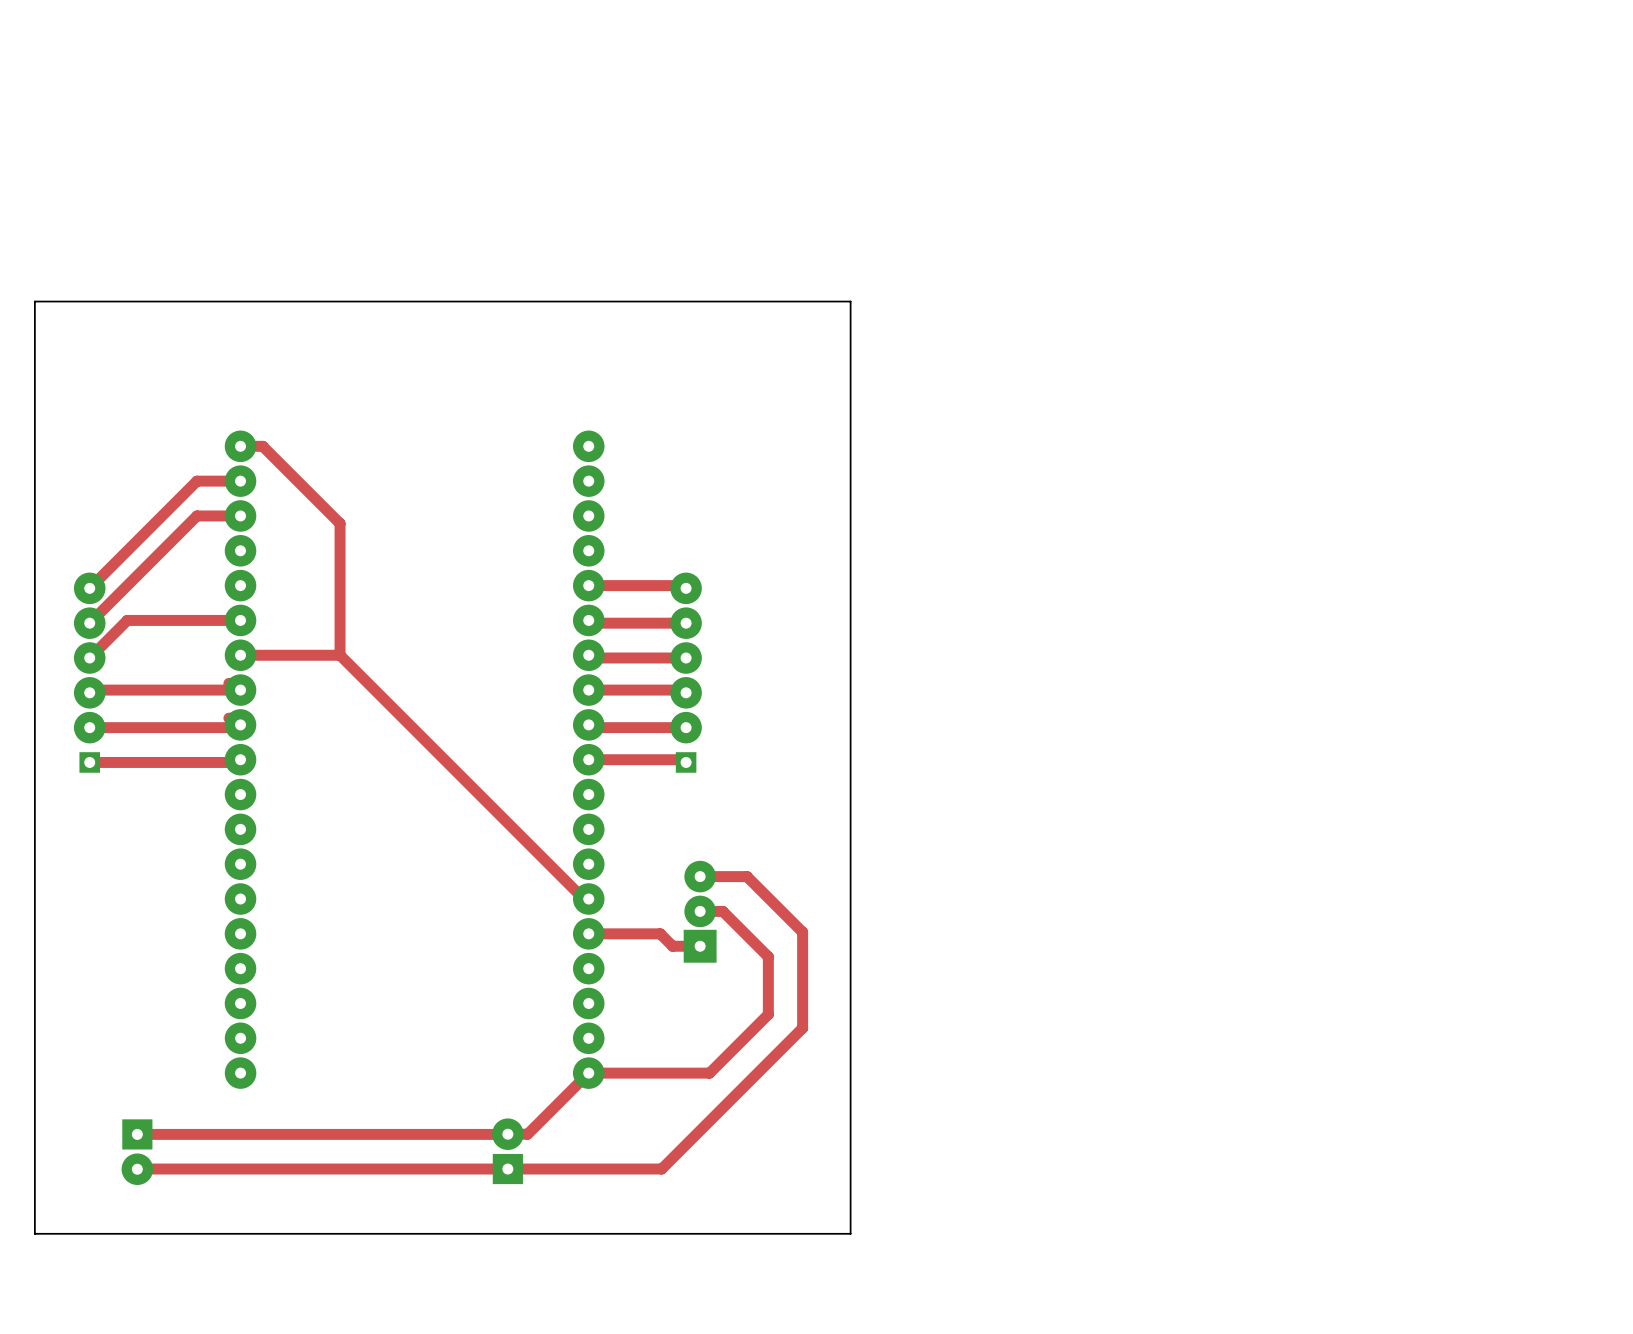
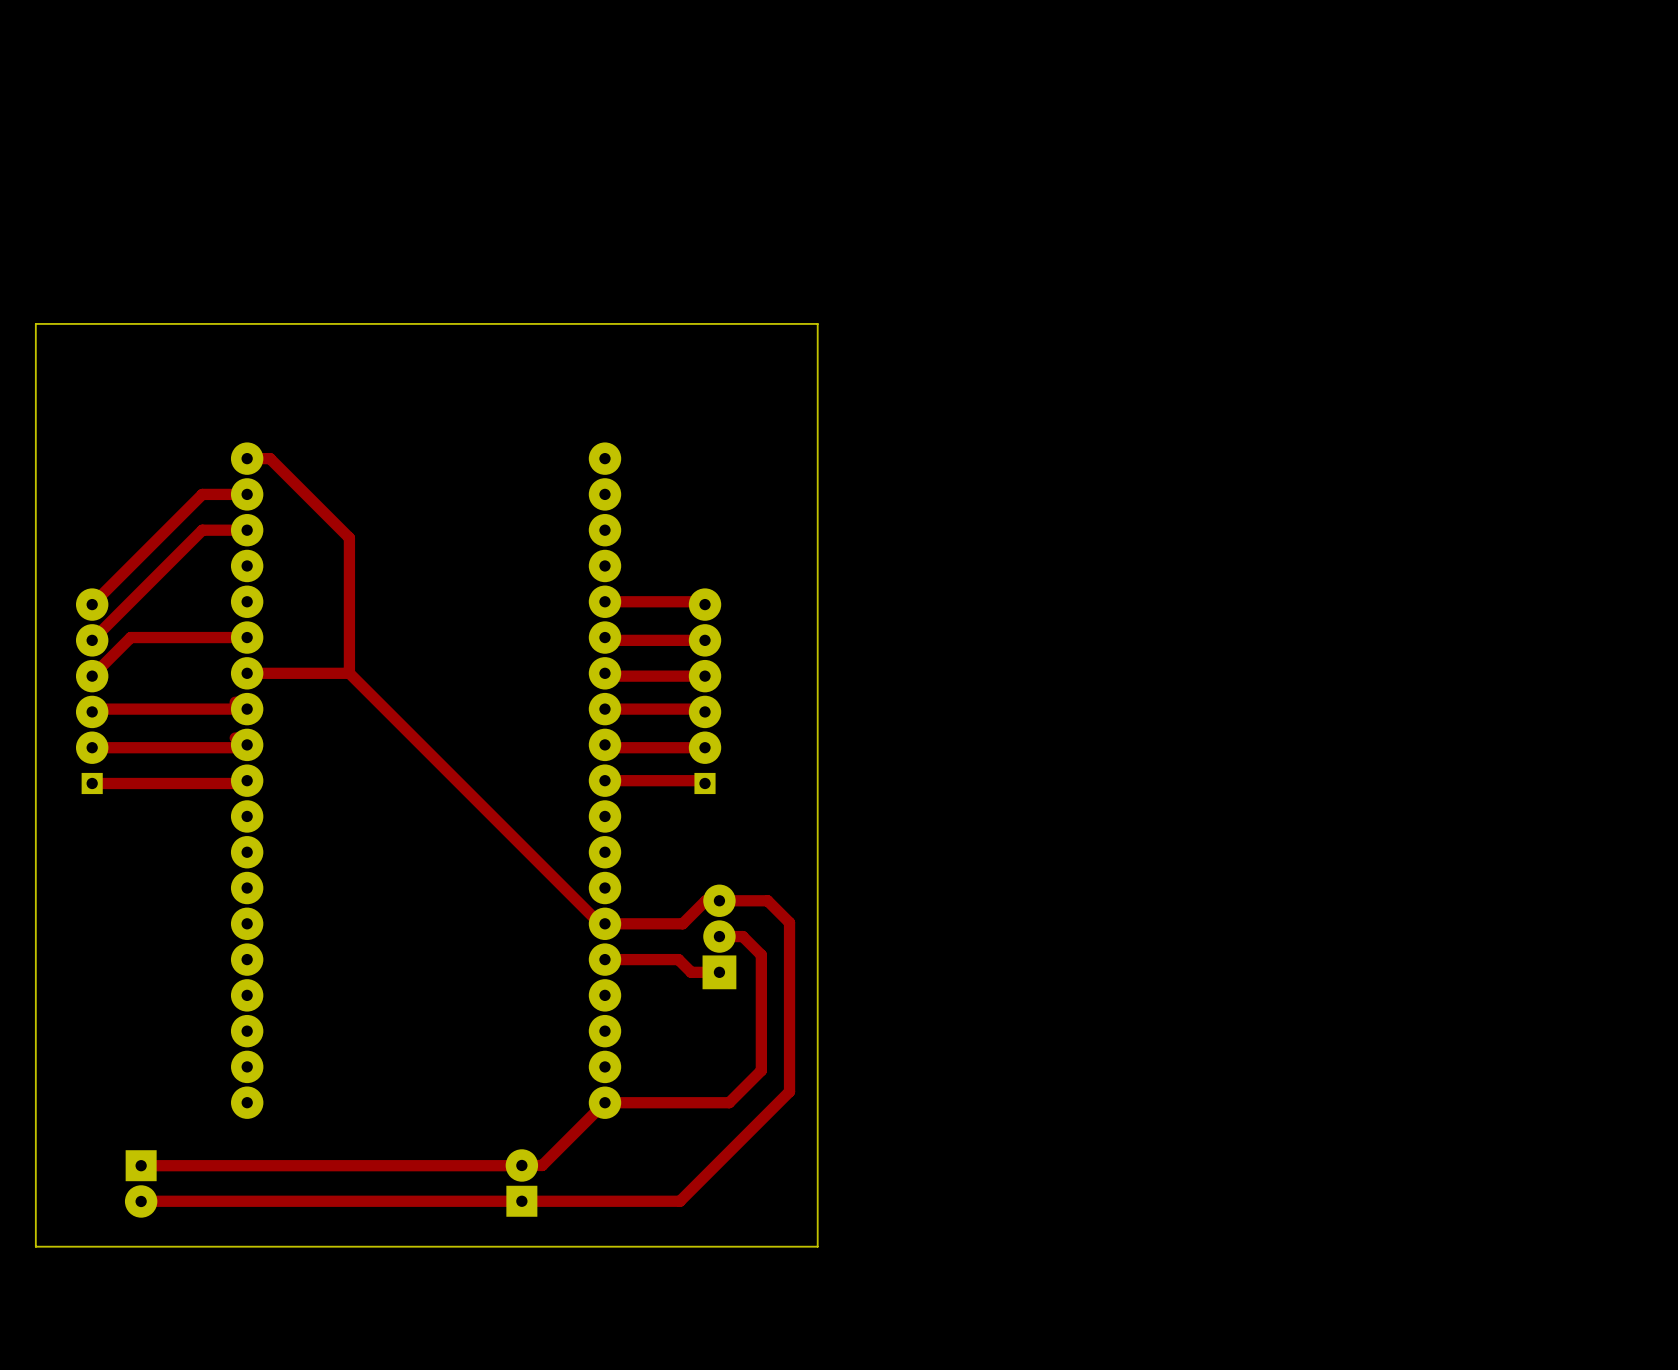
board edge: (34, 315) (34, 301) (850, 301) (850, 1233) (34, 1233) (34, 1213) -> (35, 323) (817, 323) (817, 1246) (35, 1246)
top track: none -> (719, 900) (705, 900) (682, 923) (604, 923)
top track: (768, 897) (802, 932) (802, 1028) (768, 1062) -> none
top track: (740, 929) (768, 956) -> (789, 922) (789, 983)
top track: none -> (761, 955) (761, 1070)
top track: (768, 1014) (740, 1041) -> (789, 1042) (789, 1091)

